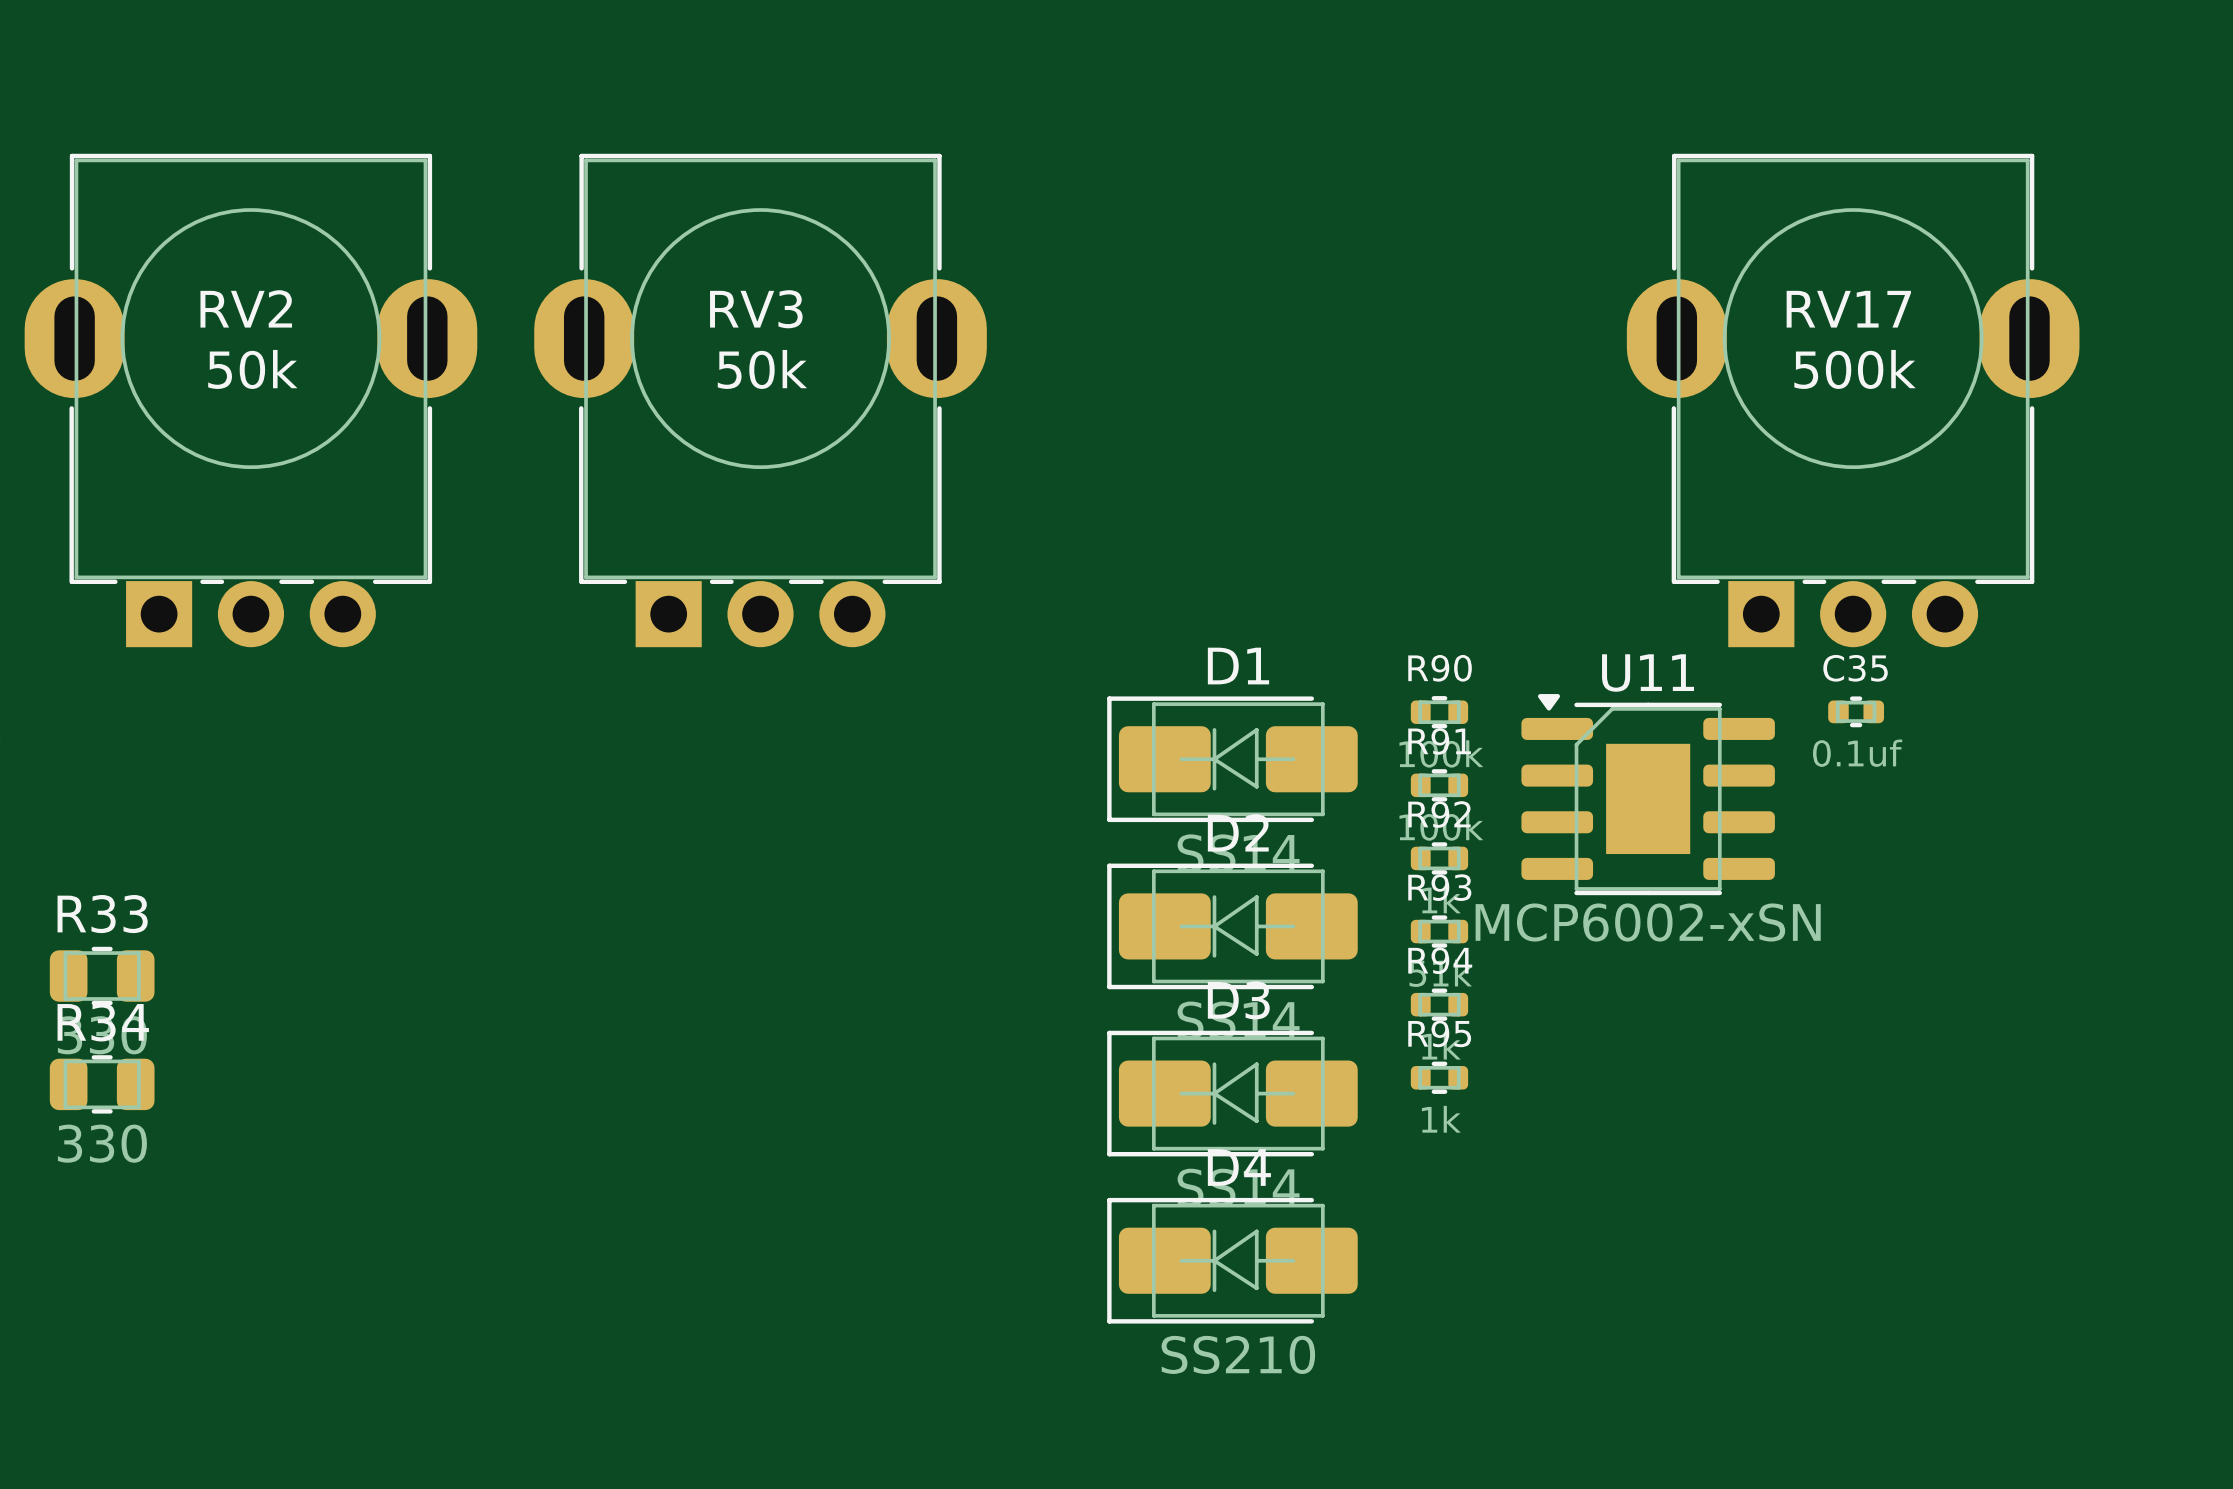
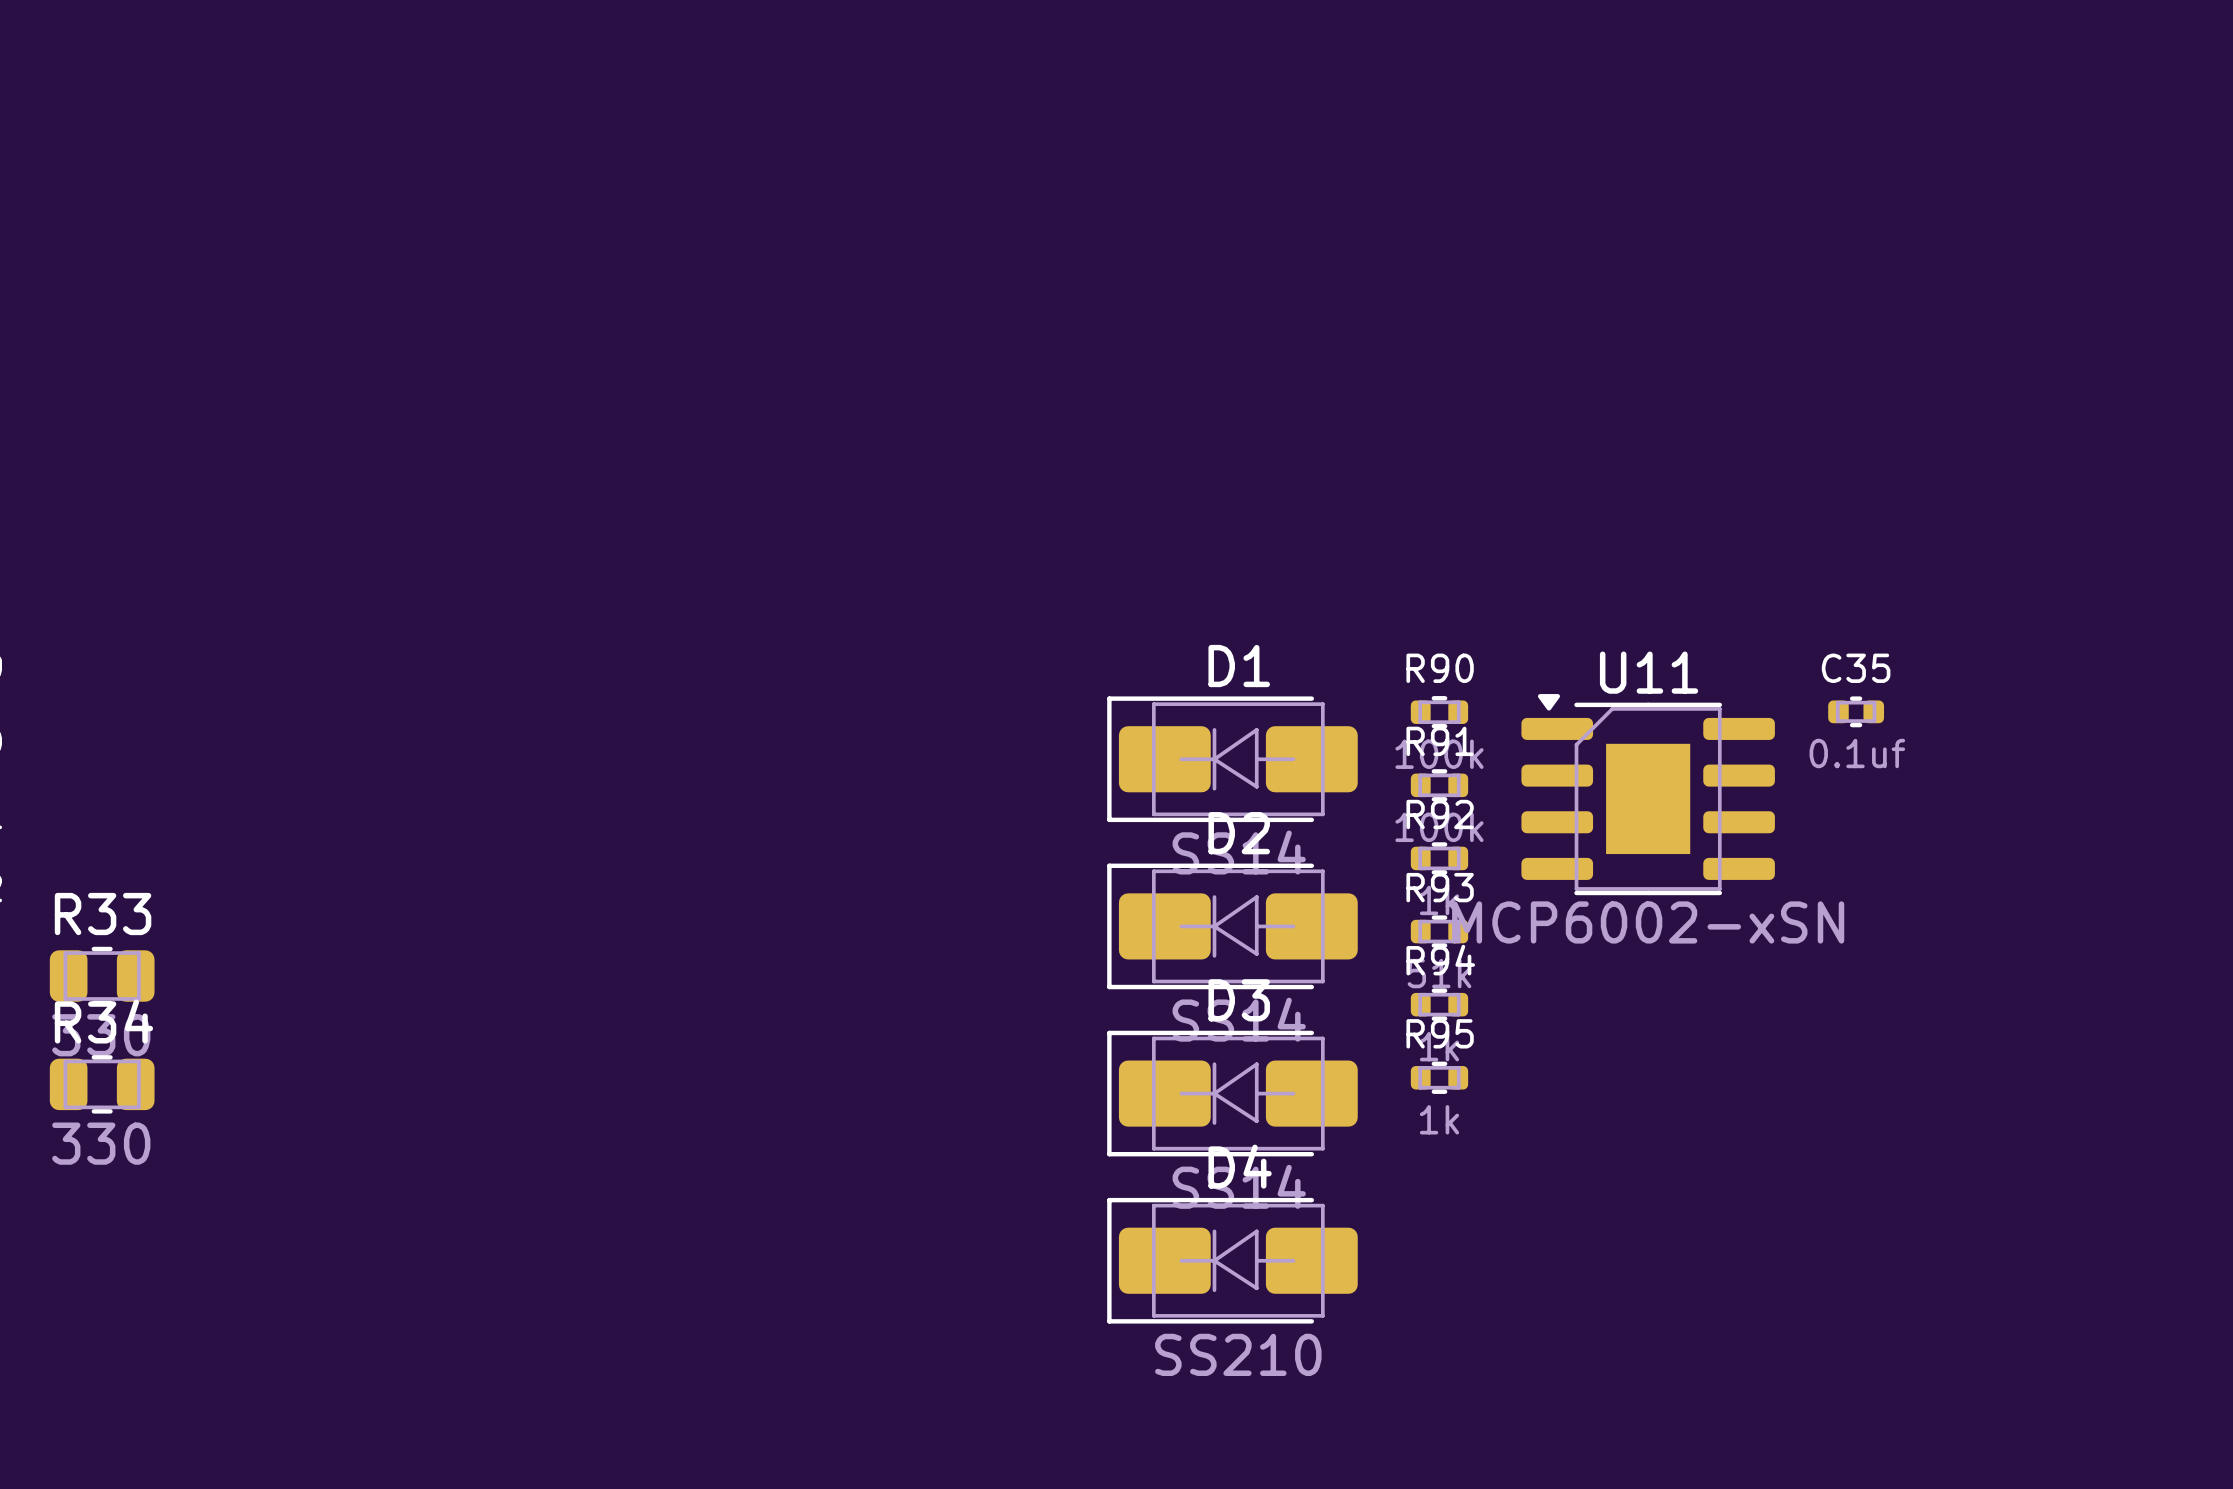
RV2: 50k (250, 400) -> none
RV3: 50k (760, 400) -> none
RV17: 500k (1853, 400) -> none

